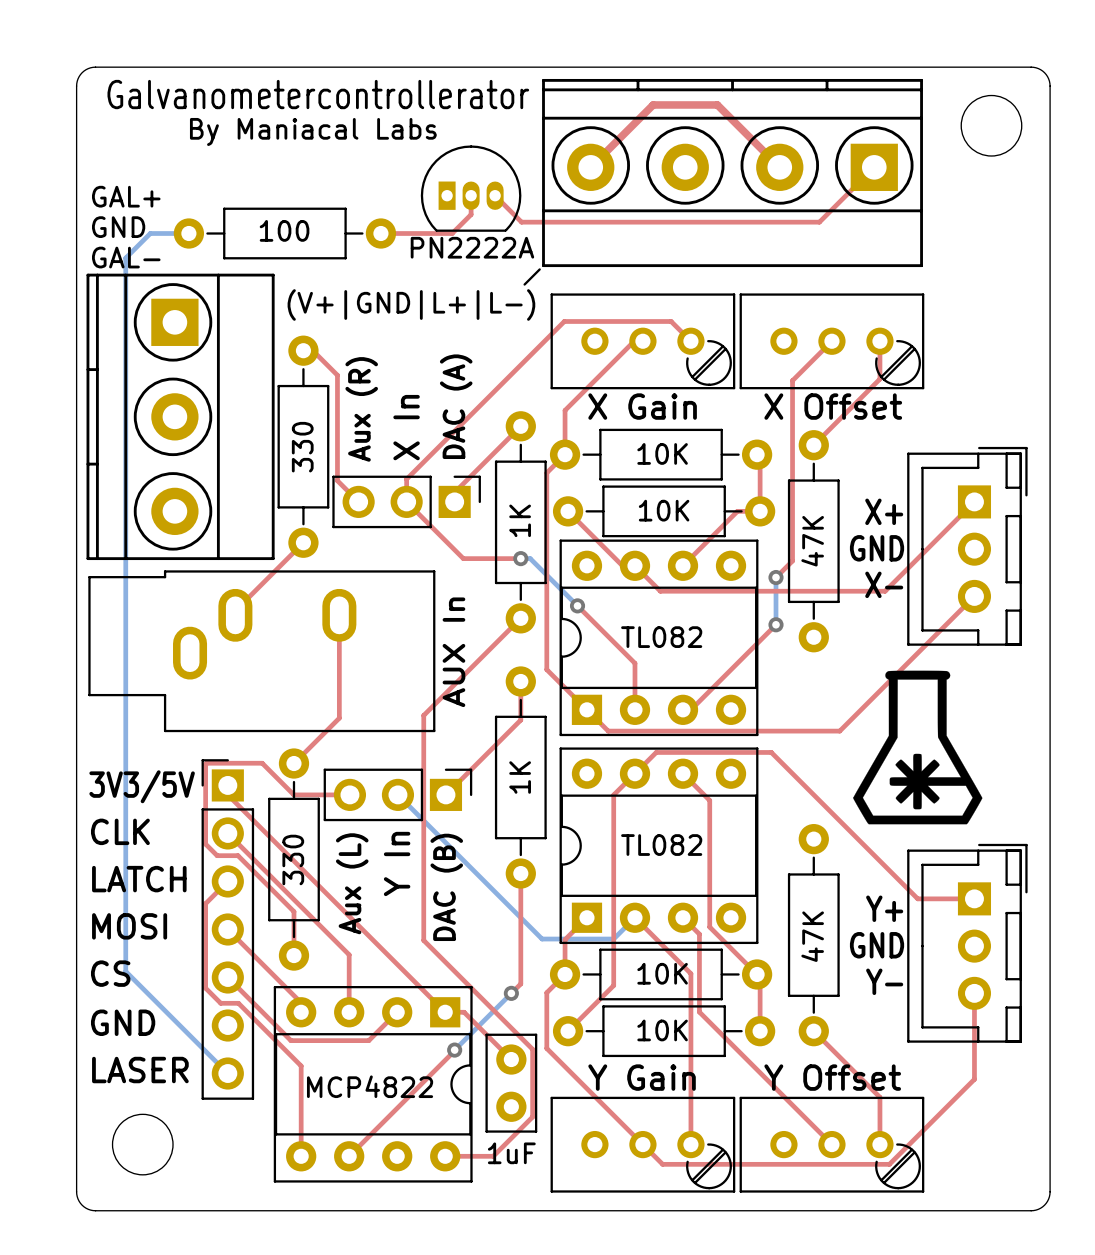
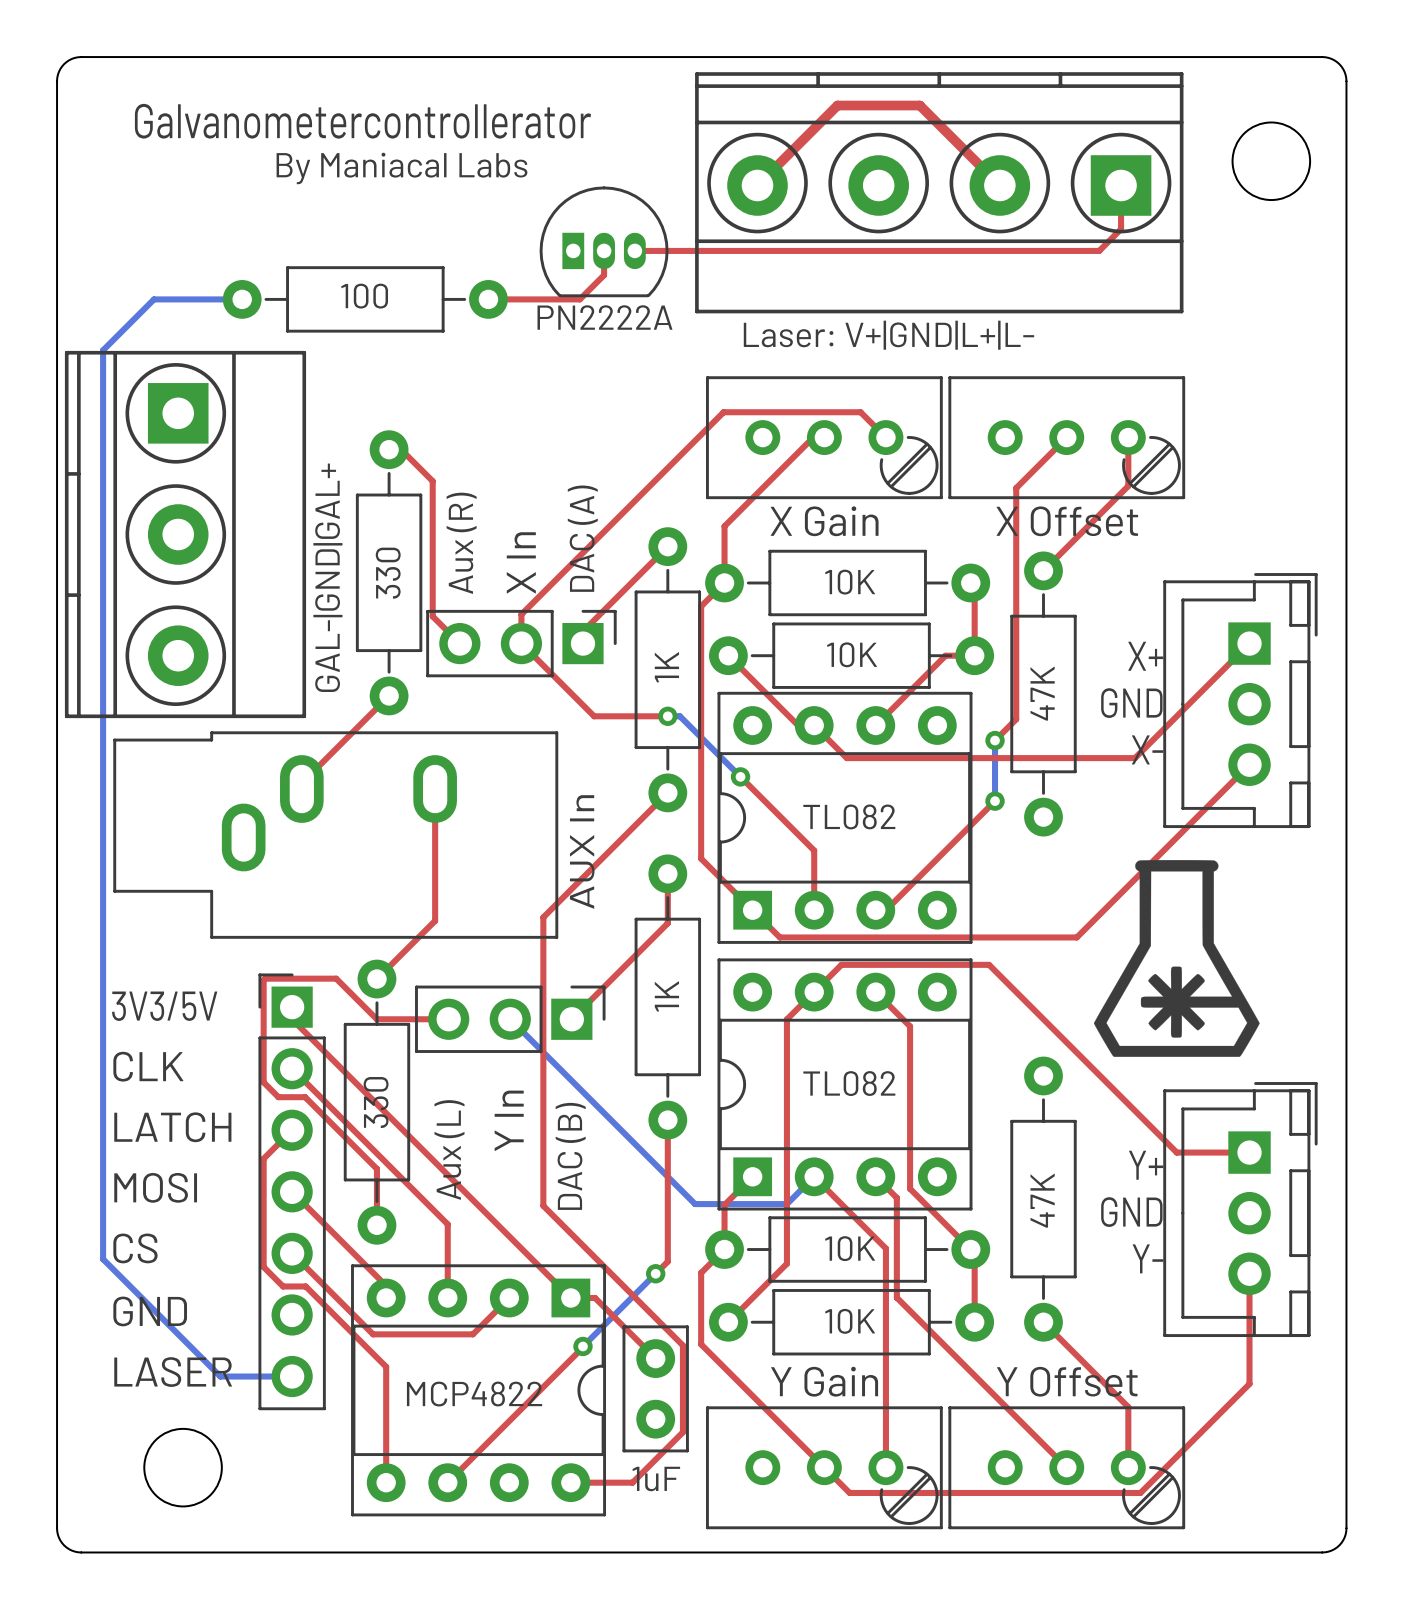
board edge: (1050, 86) (1044, 72) (1031, 67) (95, 67) (86, 69) (80, 74) (76, 86) (76, 1191) (82, 1205) (95, 1210) -> (1346, 110) (1344, 72) (1334, 60) (1322, 57) (81, 57) (69, 60) (62, 66) (57, 81) (57, 1528) (60, 1540) (72, 1550) (81, 1552) (122, 1552)
top track: (590, 167) (653, 104) (717, 104) (779, 167) -> (757, 185) (837, 105) (919, 105) (999, 185)
top track: (874, 167) (819, 222) (521, 222) (495, 195) -> (1121, 185) (1121, 229) (1099, 250) (634, 250)
part position: (732, 173) -> (939, 192)
text: GAL+ (126, 196) -> none
text: GND (118, 227) -> none
bottom track: (150, 233) (125, 258) (125, 971) (227, 1073) -> (192, 299) (153, 299) (103, 350) (103, 1259) (220, 1376) (292, 1376)
text: GAL- (126, 257) -> none
text: none -> Laser: V+|GND|L+|L- (888, 335)
line: (539, 269) (524, 284) -> none
text: (V+|GND|L+|L-) (411, 304) -> none
part position: (180, 416) -> (185, 534)
text: none -> GAL-|GND|GAL+ (327, 577)

